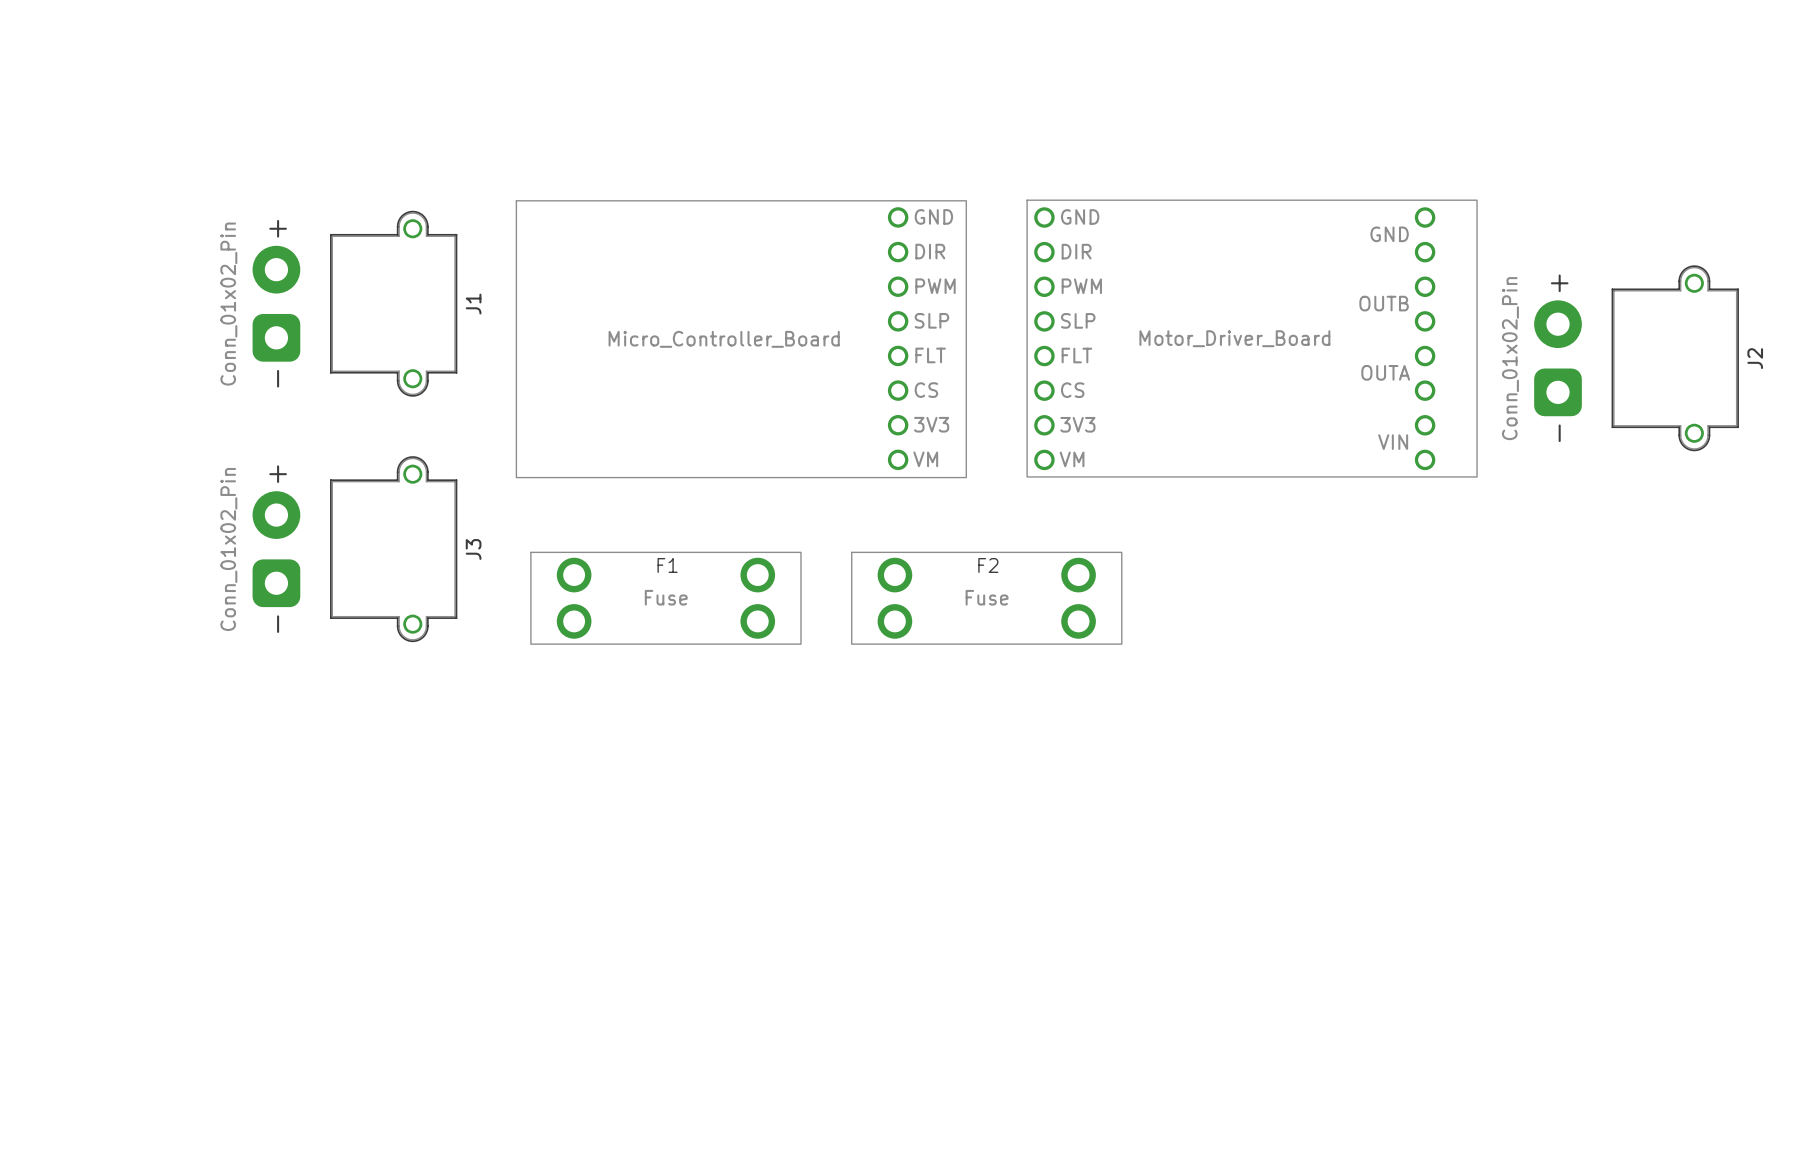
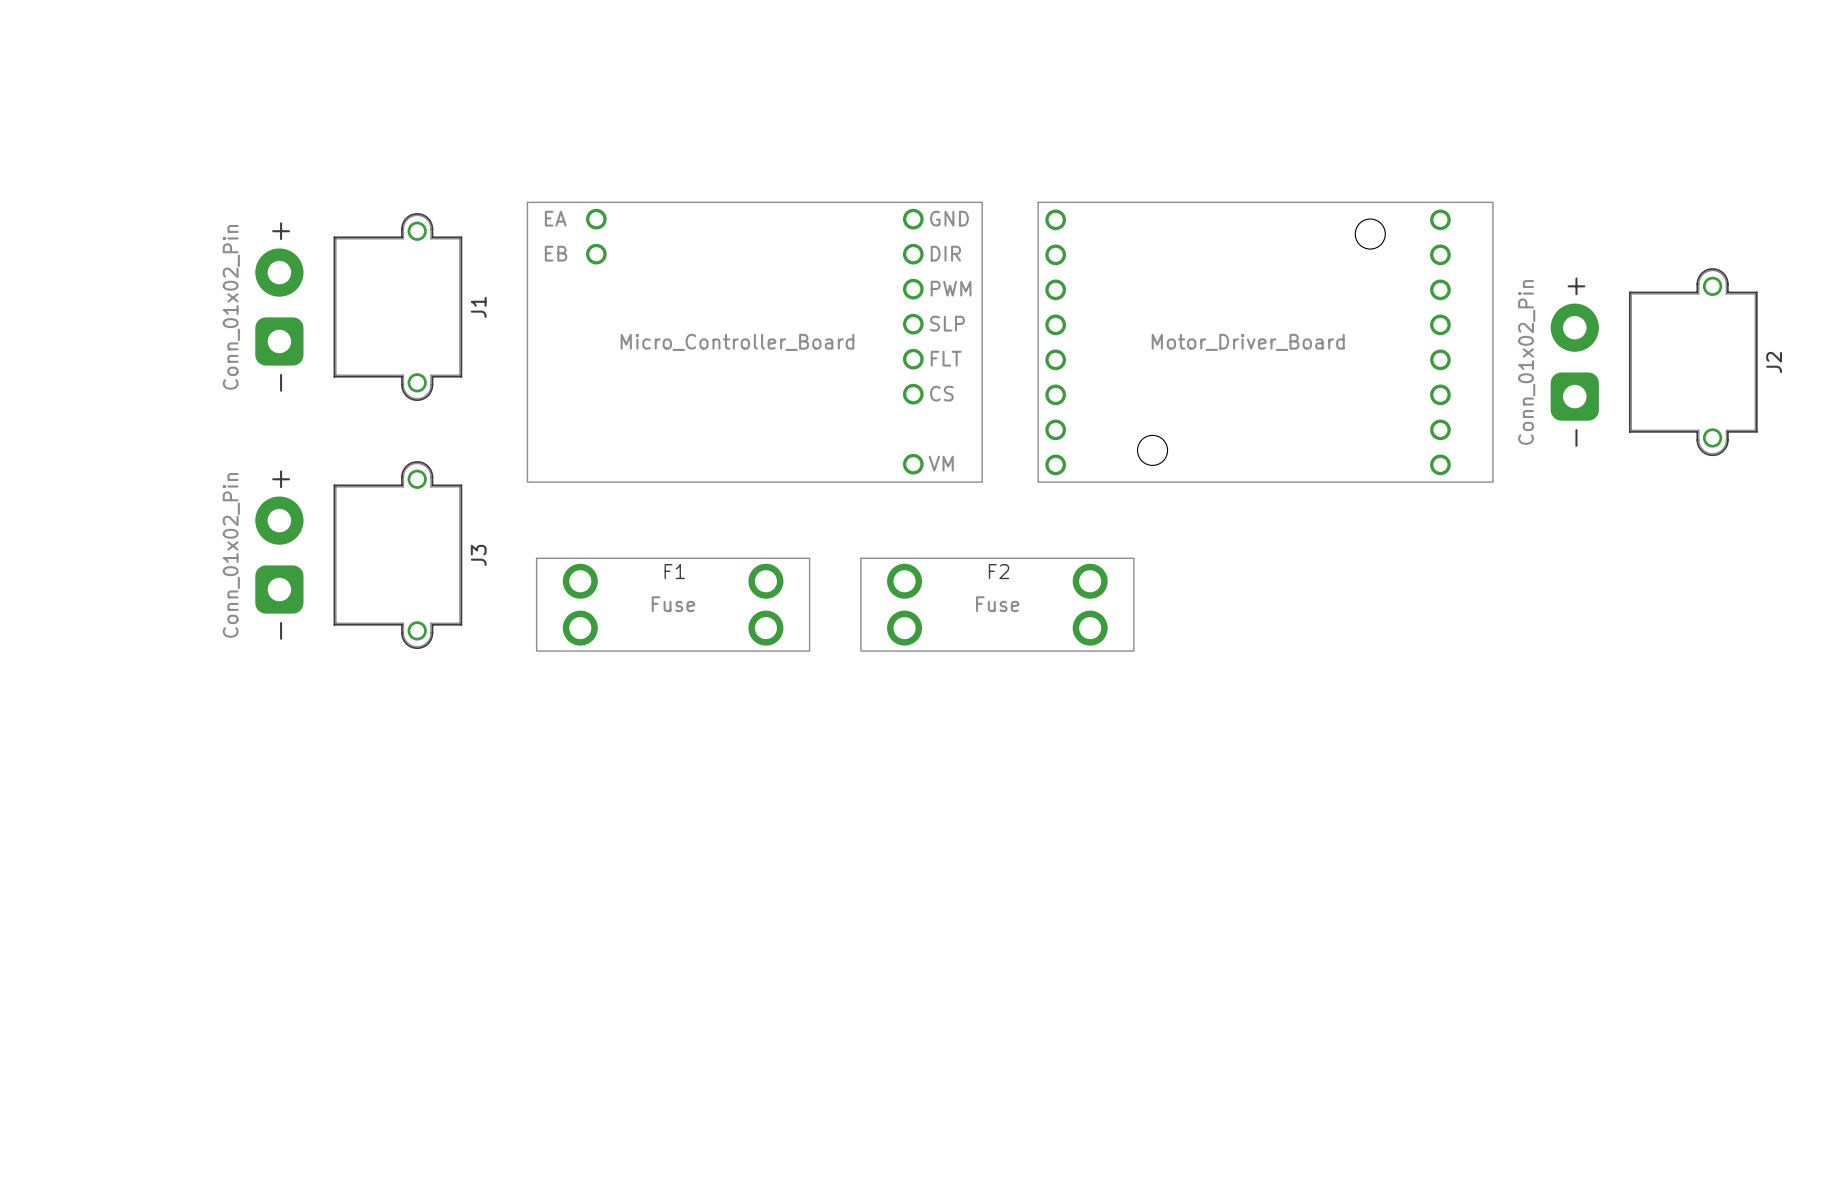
part footprint: [1026, 199, 1478, 478] -> [1037, 201, 1494, 483]
part footprint: [515, 200, 967, 479] -> [526, 201, 983, 483]

